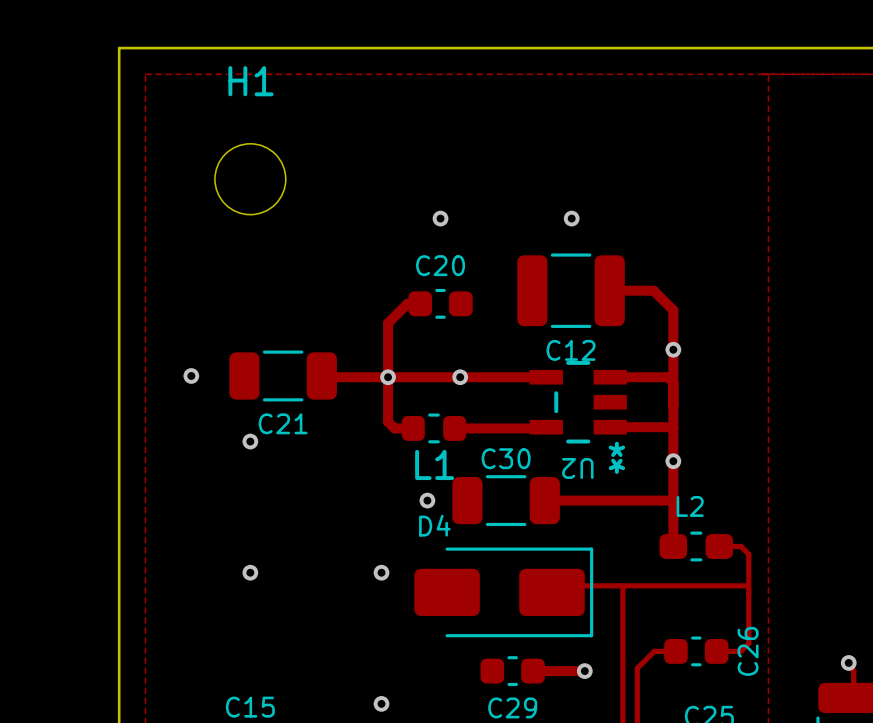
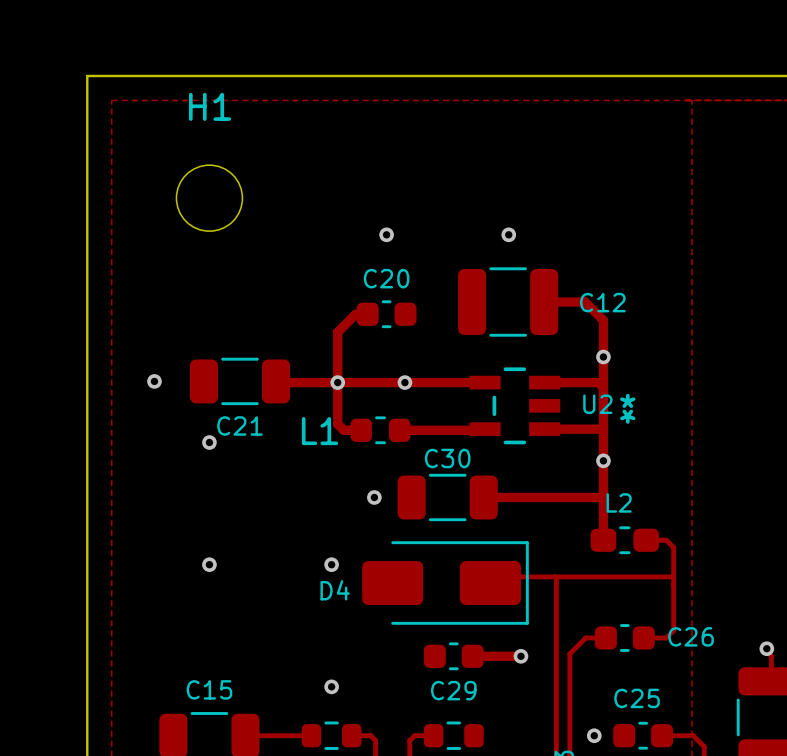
C12 name position: C12 (571, 350) -> C12 (602, 302)
U2 footprint: [529, 360, 627, 444] -> [469, 367, 561, 445]
L1 name position: L1 (434, 464) -> L1 (319, 431)
U2 name position: U2 (577, 468) -> U2 (597, 404)
D4 name position: D4 (434, 525) -> D4 (335, 590)
C26 name rotation: 0° (748, 651) -> 90° clockwise (691, 636)

